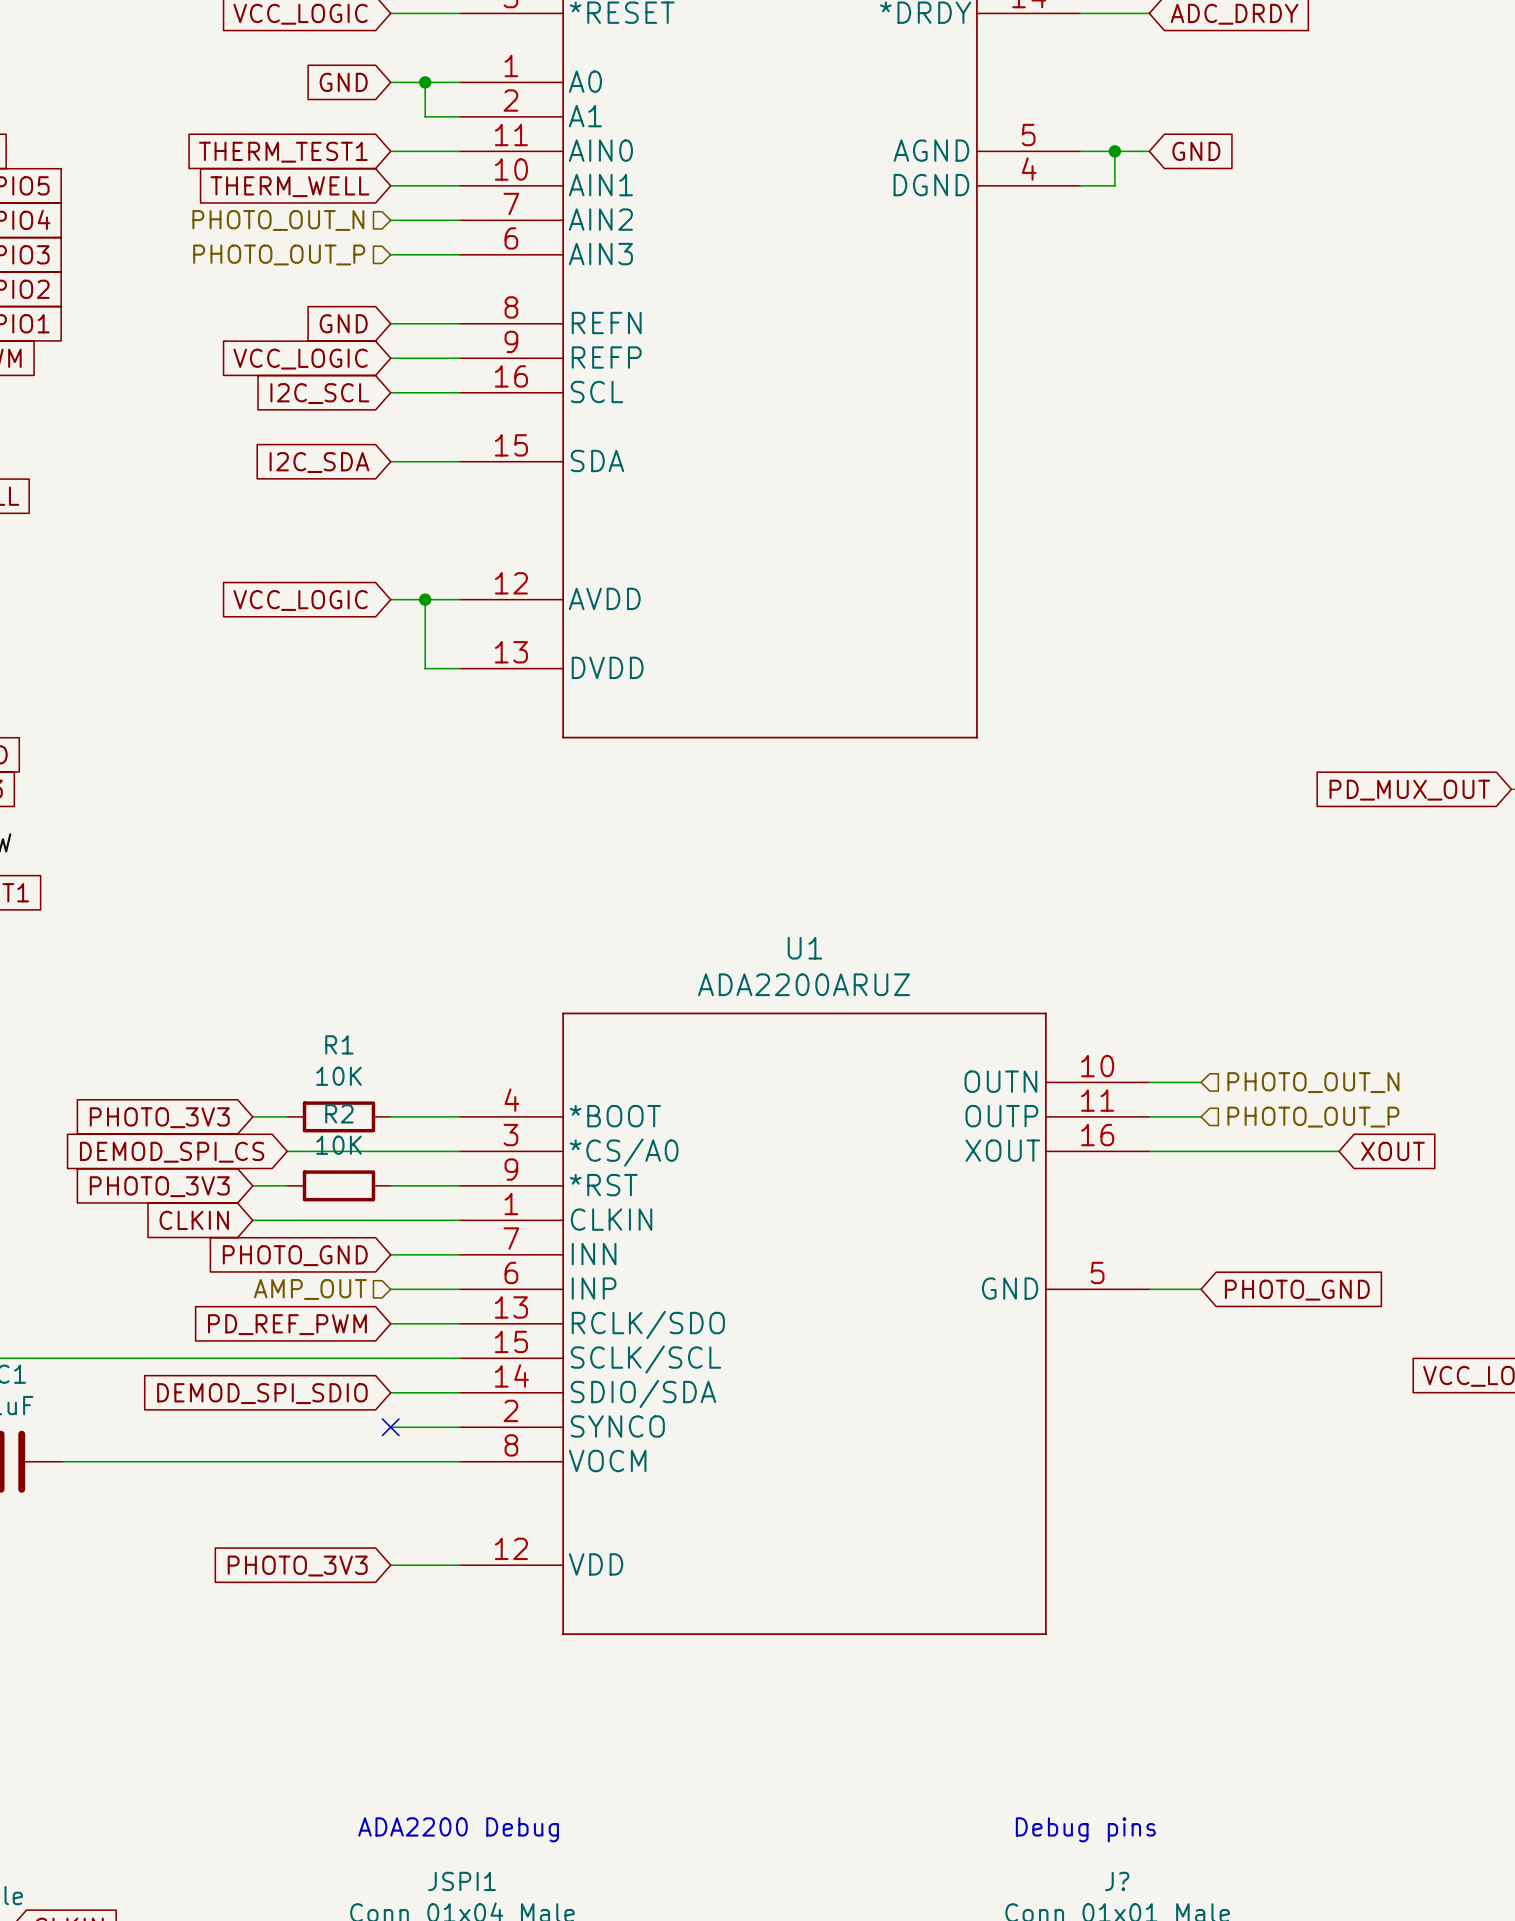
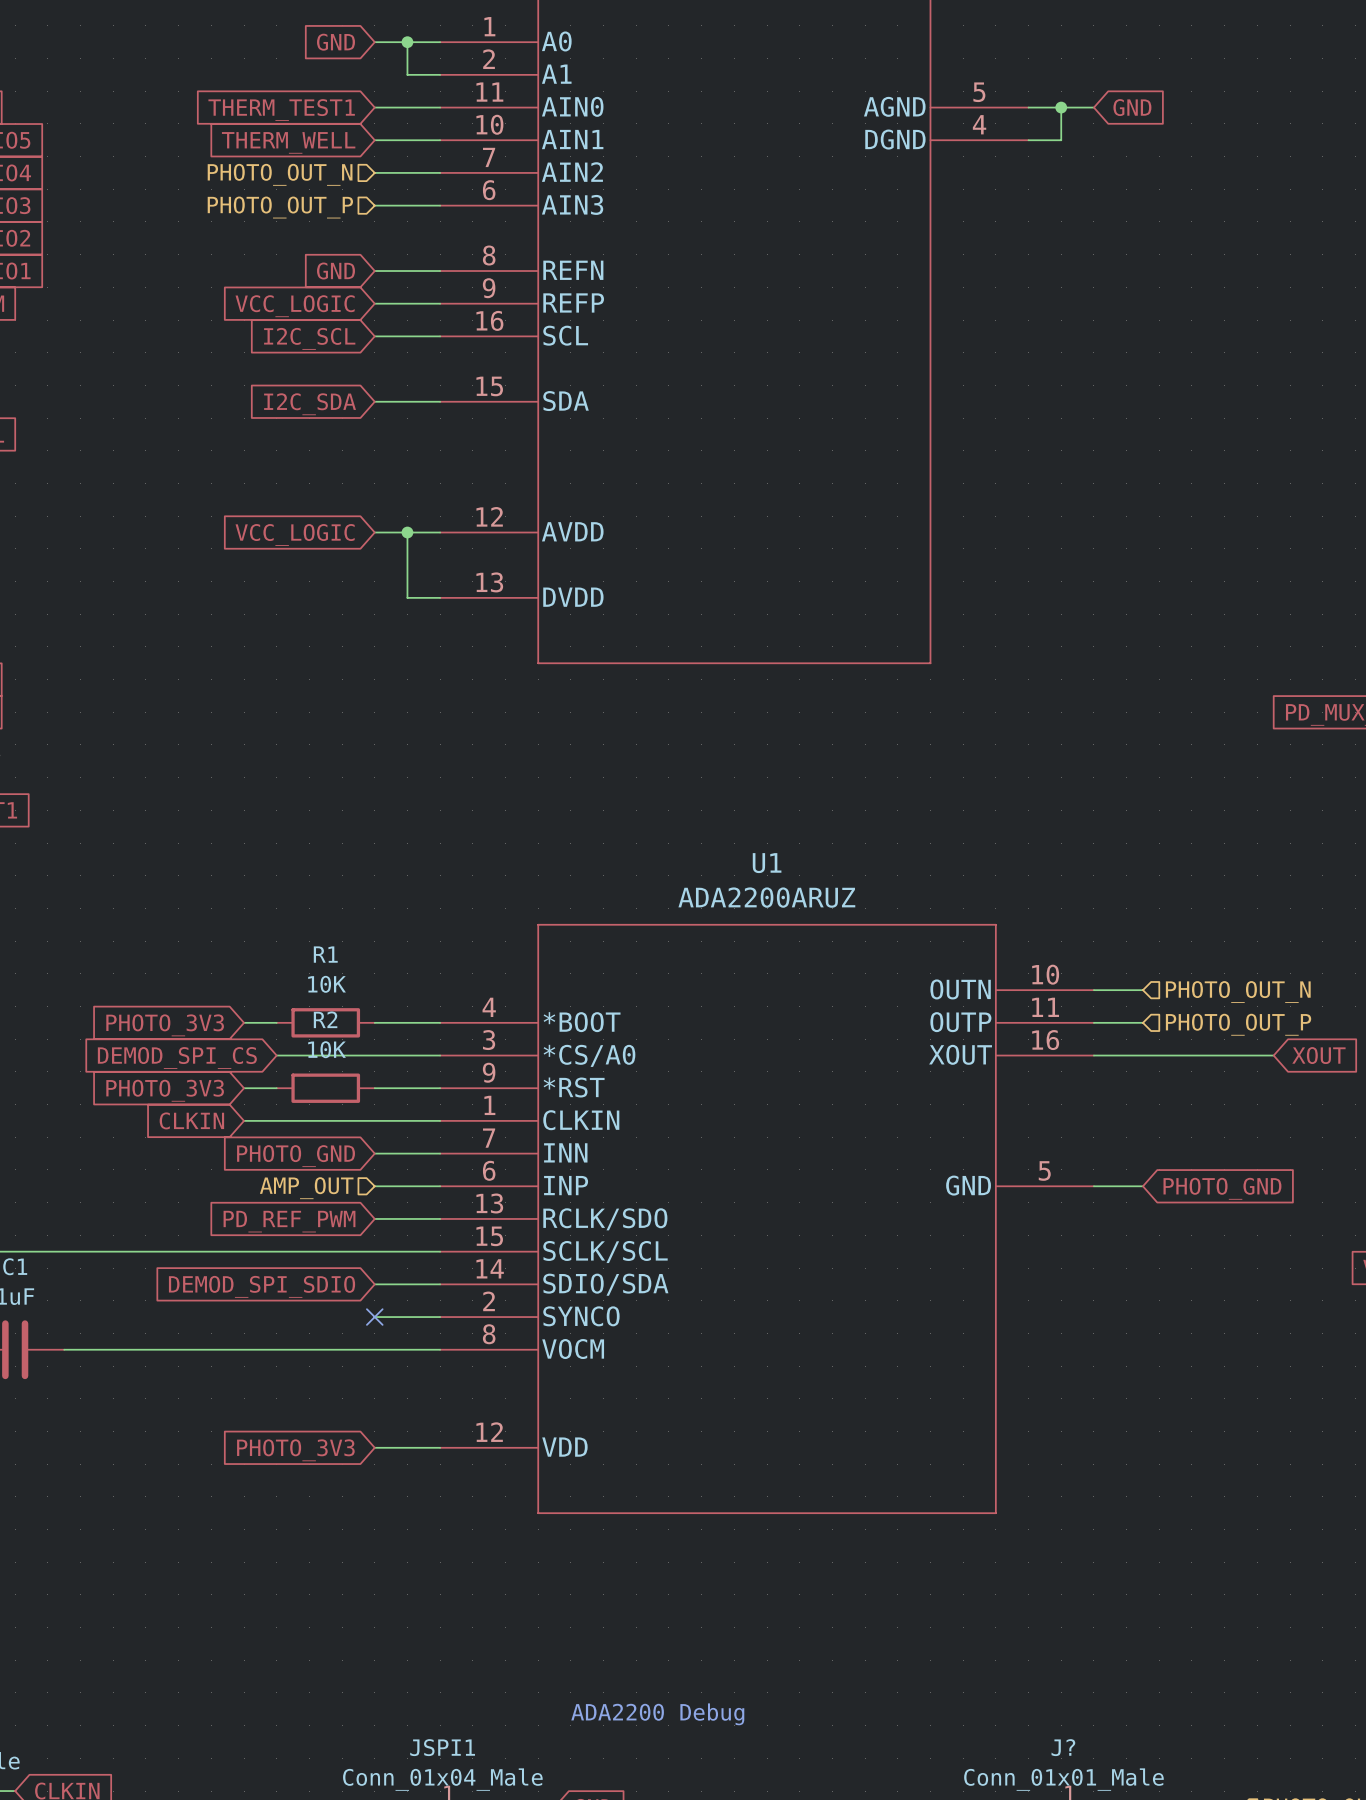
text position: ADA2200 Debug (458, 1829) -> ADA2200 Debug (657, 1714)
text: Debug pins (1085, 1829) -> none

